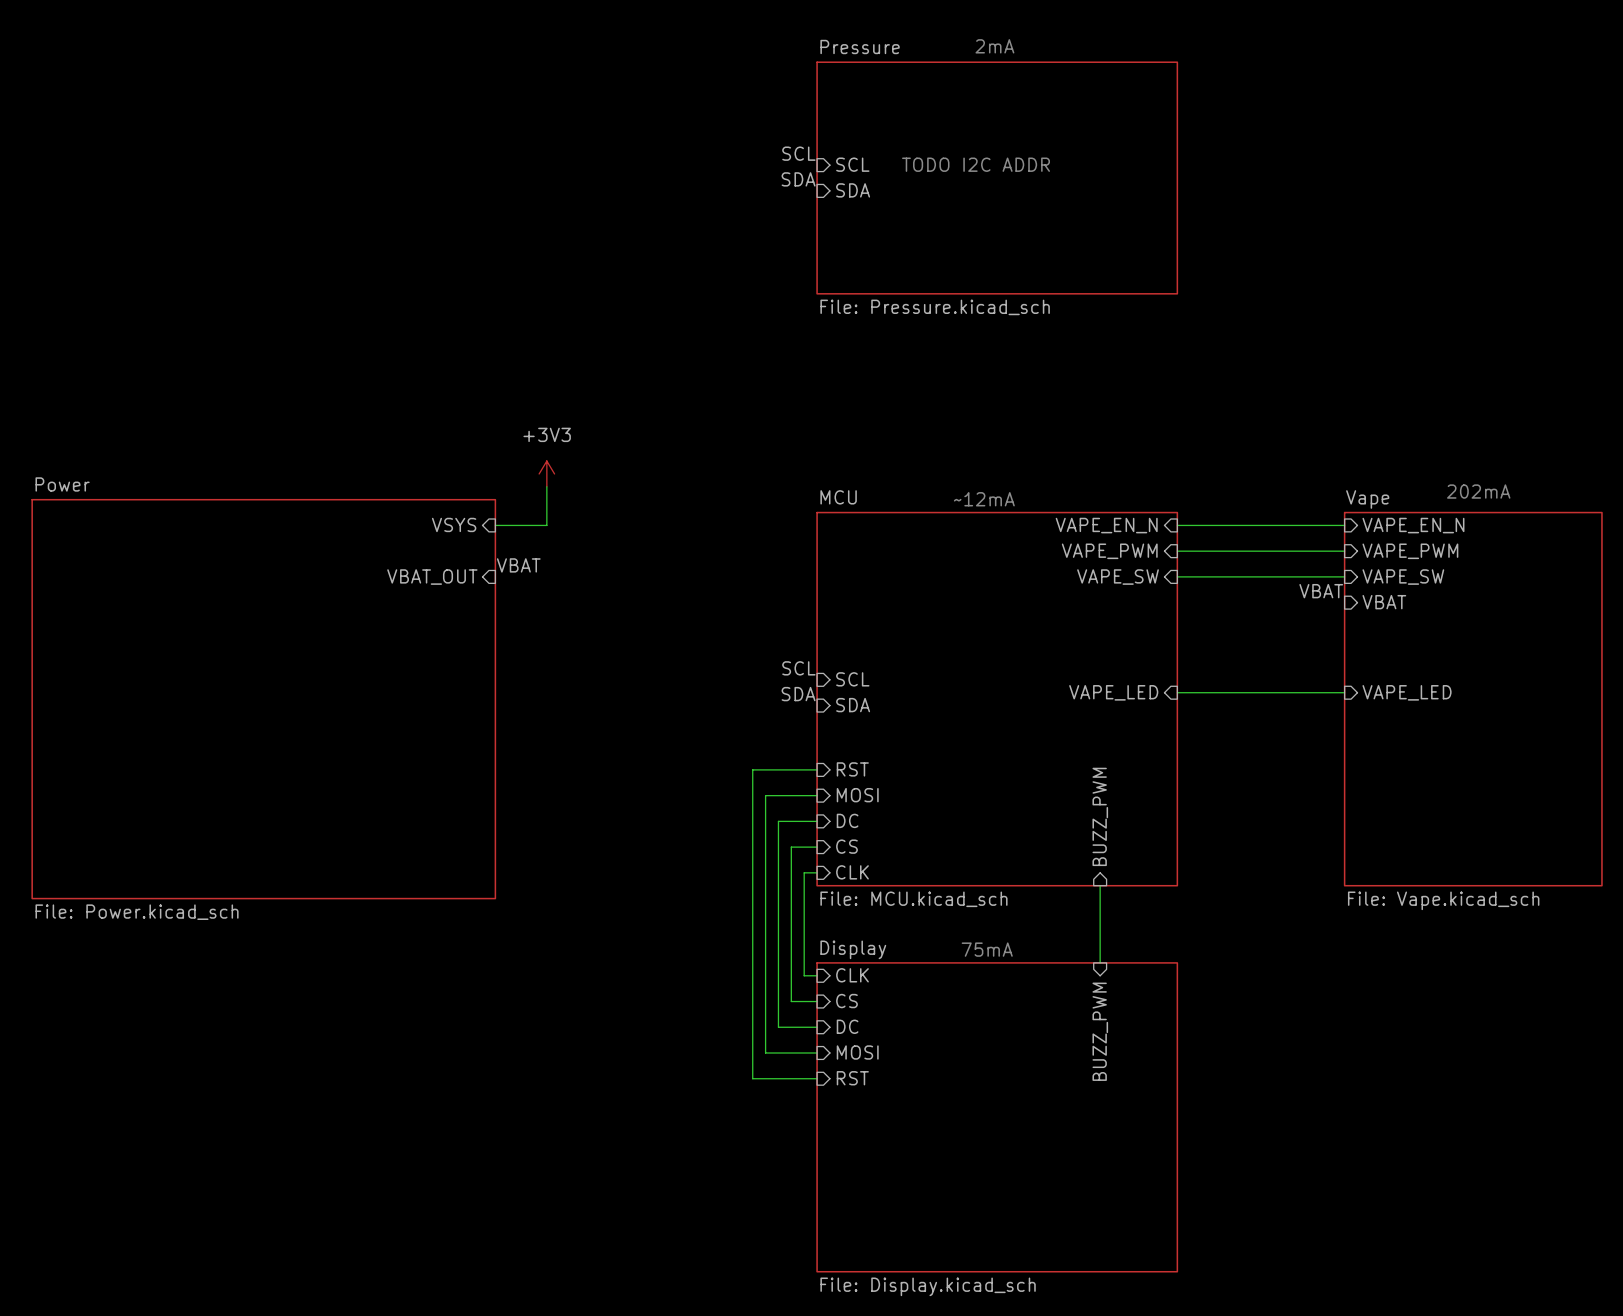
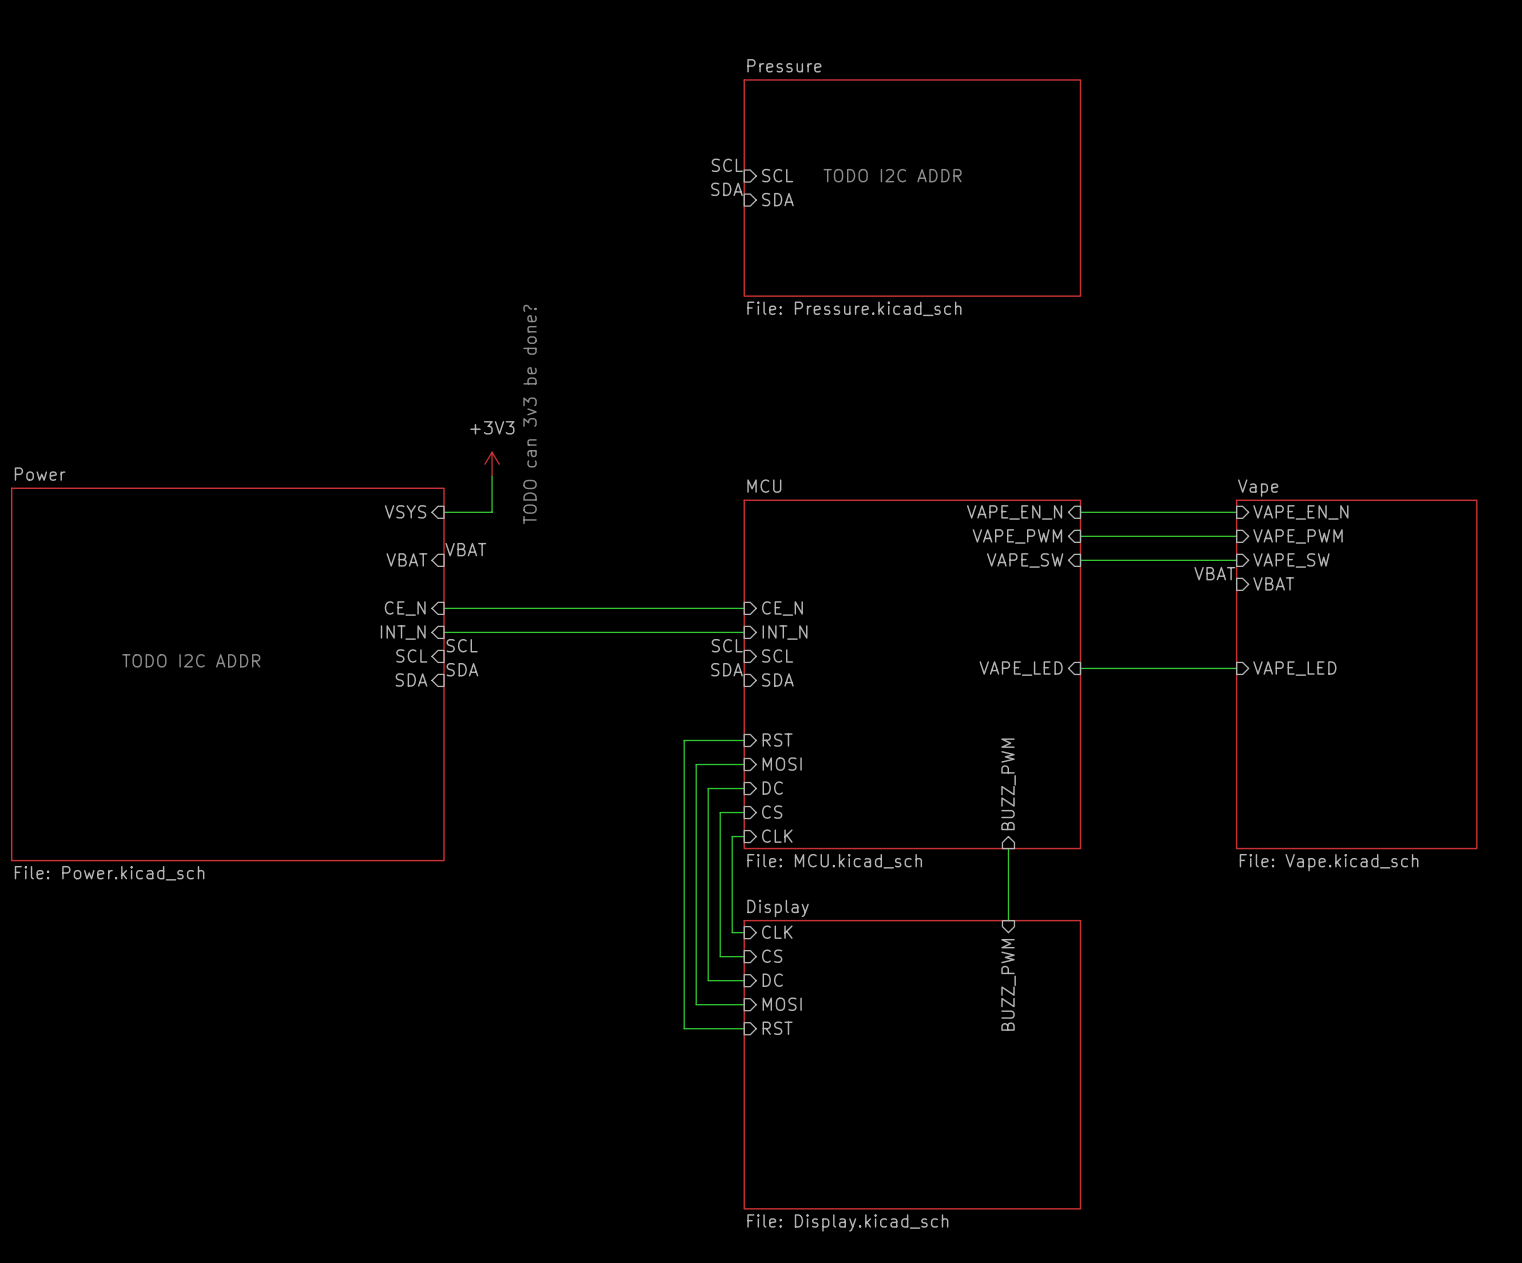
text: 2mA (994, 46) -> none
text: none -> TODO can 3v3 be done? (530, 414)
text: 202mA (1478, 491) -> none
text: ~12mA (984, 499) -> none
sheet pin: VBAT_OUT (432, 577) -> VBAT (406, 559)
sheet pin: none -> CE_N (405, 608)
wire: none -> (444, 608) (744, 608)
sheet pin: none -> CE_N (782, 608)
sheet pin: none -> INT_N (403, 632)
wire: none -> (444, 632) (744, 632)
sheet pin: none -> INT_N (785, 632)
label: none -> SCL (462, 645)
sheet pin: none -> SCL (411, 655)
text: none -> TODO I2C ADDR (191, 660)
label: none -> SDA (462, 669)
sheet pin: none -> SDA (411, 679)
text: 75mA (987, 949) -> none

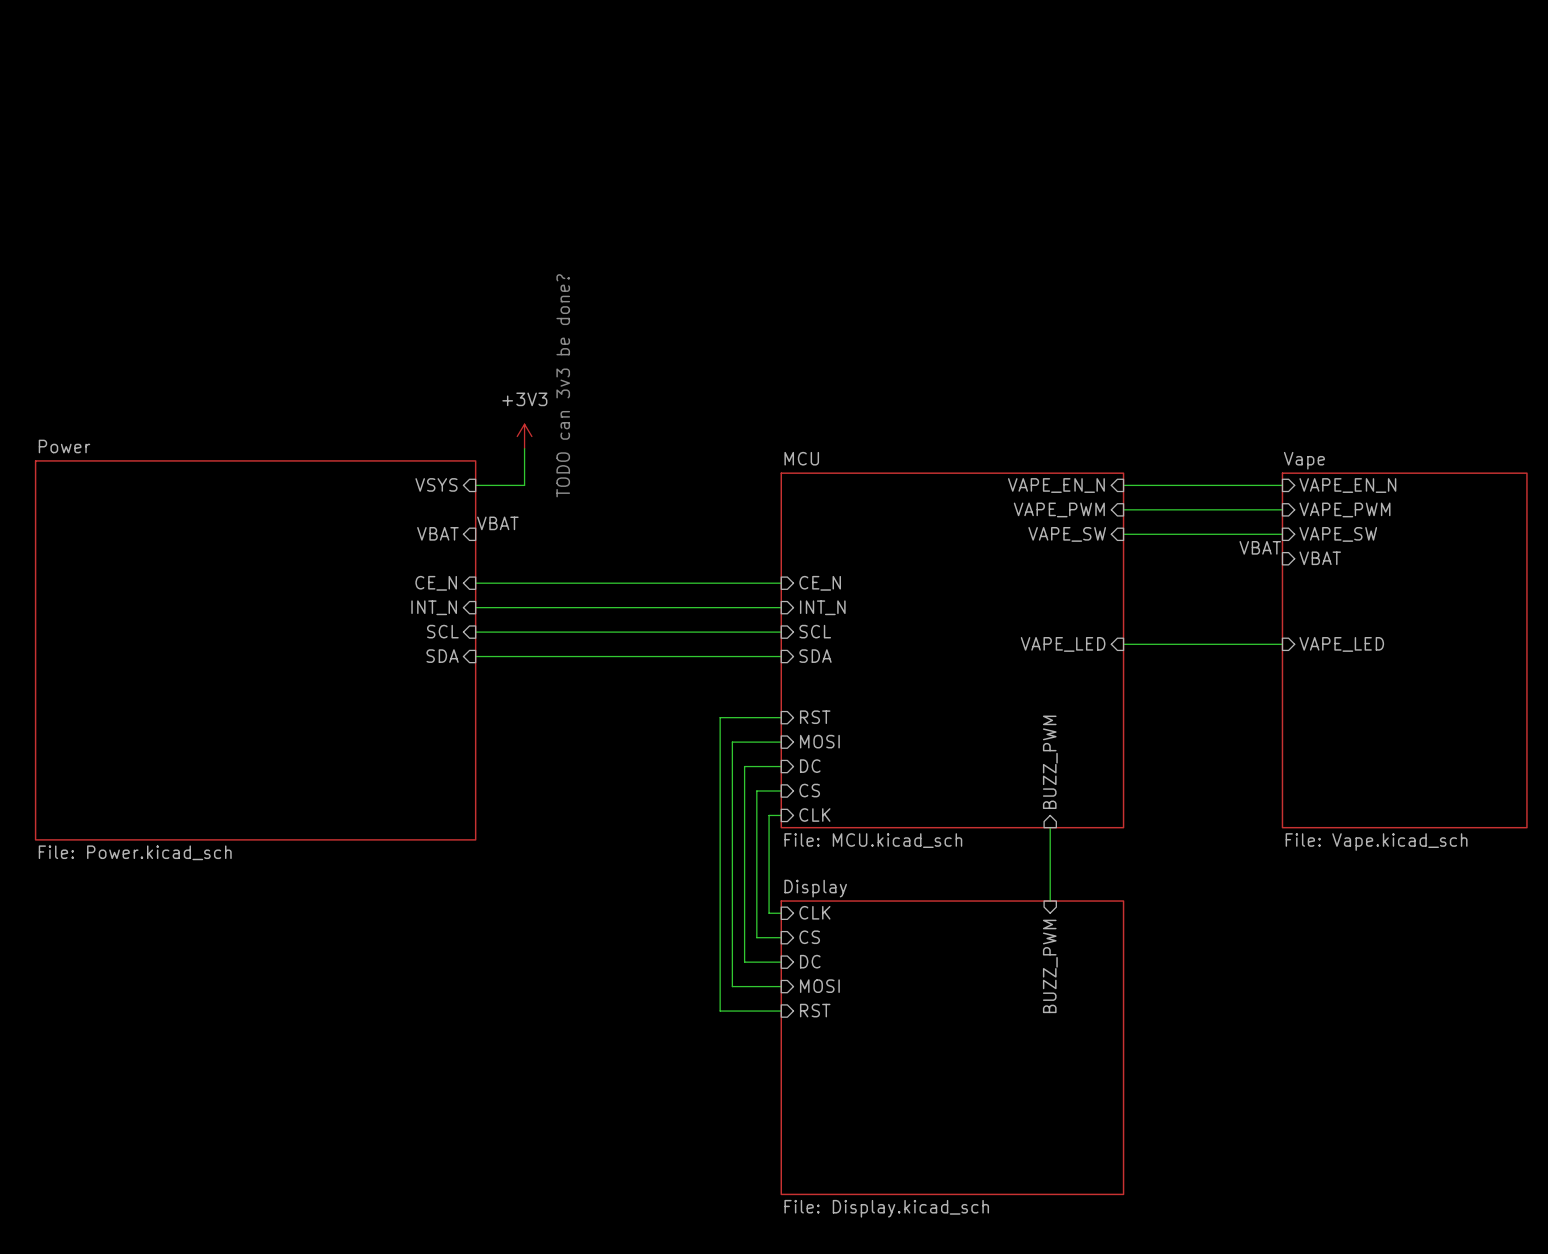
label: SCL (727, 165) -> none
sheet pin: SCL (777, 175) -> none
text: TODO I2C ADDR (892, 175) -> none
sheet Pressure: File: Pressure.kicad_sch (912, 188) -> none
label: SDA (727, 189) -> none
sheet pin: SDA (777, 199) -> none
label: SCL (462, 645) -> none
label: SCL (727, 645) -> none
wire: none -> (475, 632) (781, 632)
text: TODO I2C ADDR (191, 660) -> none
label: SDA (462, 669) -> none
label: SDA (727, 669) -> none
wire: none -> (475, 656) (781, 656)

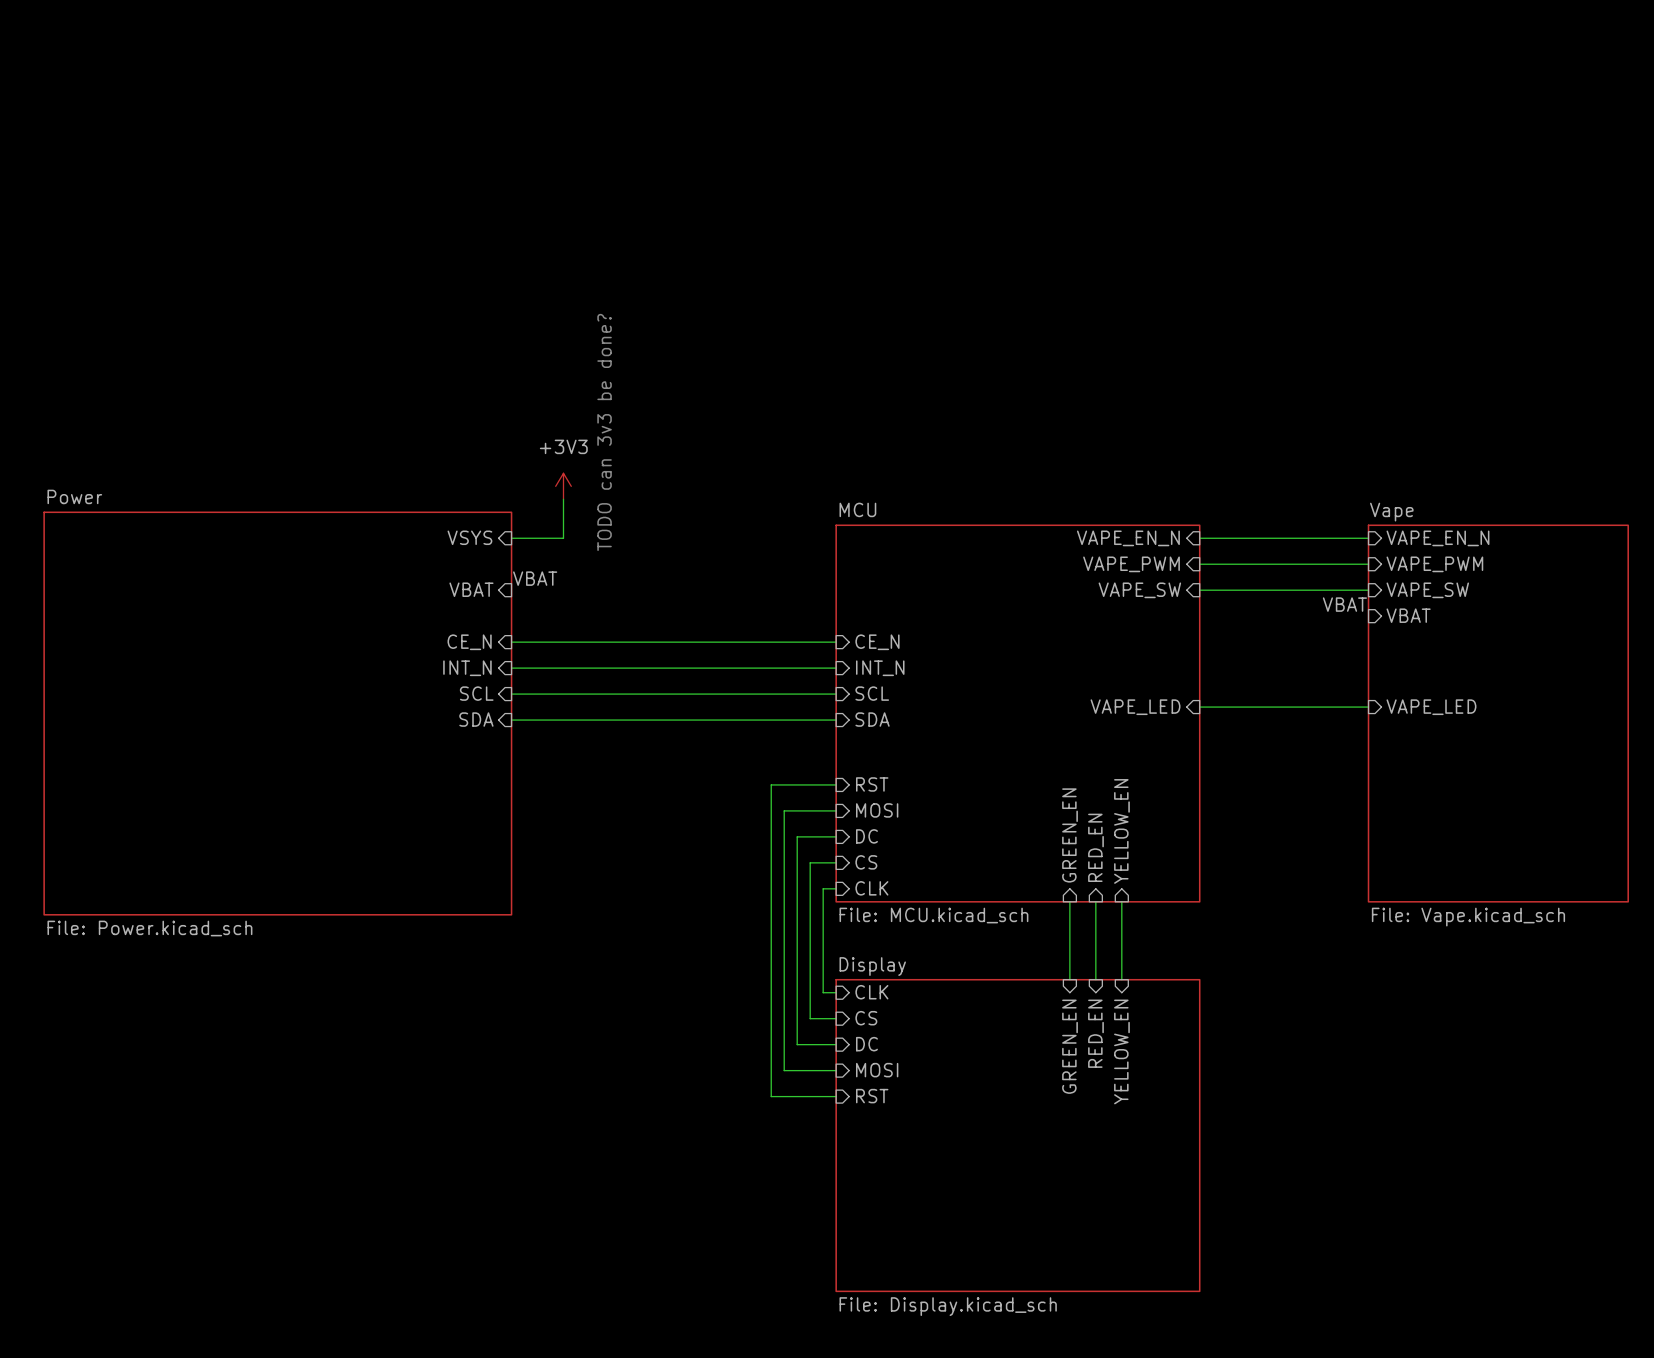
sheet pin: BUZZ_PWM (1050, 762) -> YELLOW_EN (1121, 831)
sheet pin: none -> GREEN_EN (1070, 835)
sheet pin: none -> RED_EN (1095, 847)
wire: none -> (1069, 901) (1069, 979)
wire: none -> (1095, 901) (1095, 979)
sheet pin: none -> RED_EN (1095, 1033)
sheet pin: none -> GREEN_EN (1070, 1046)
sheet pin: BUZZ_PWM (1050, 966) -> YELLOW_EN (1121, 1051)

